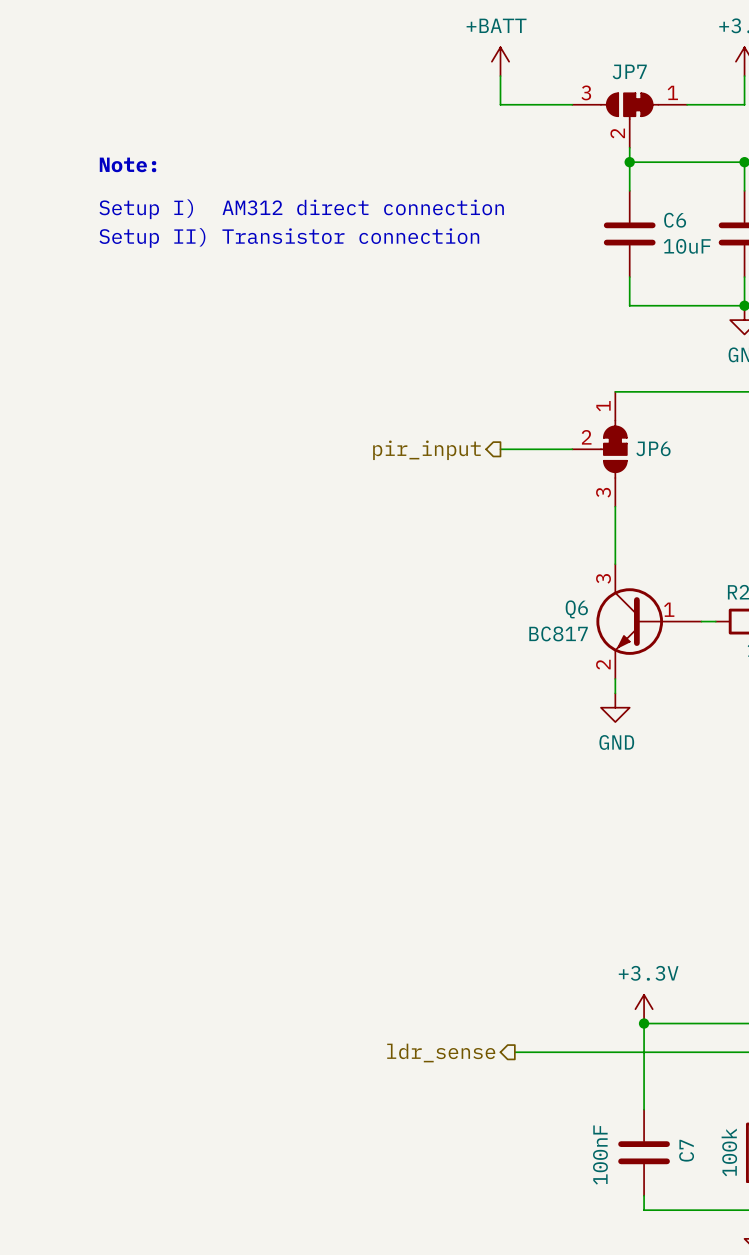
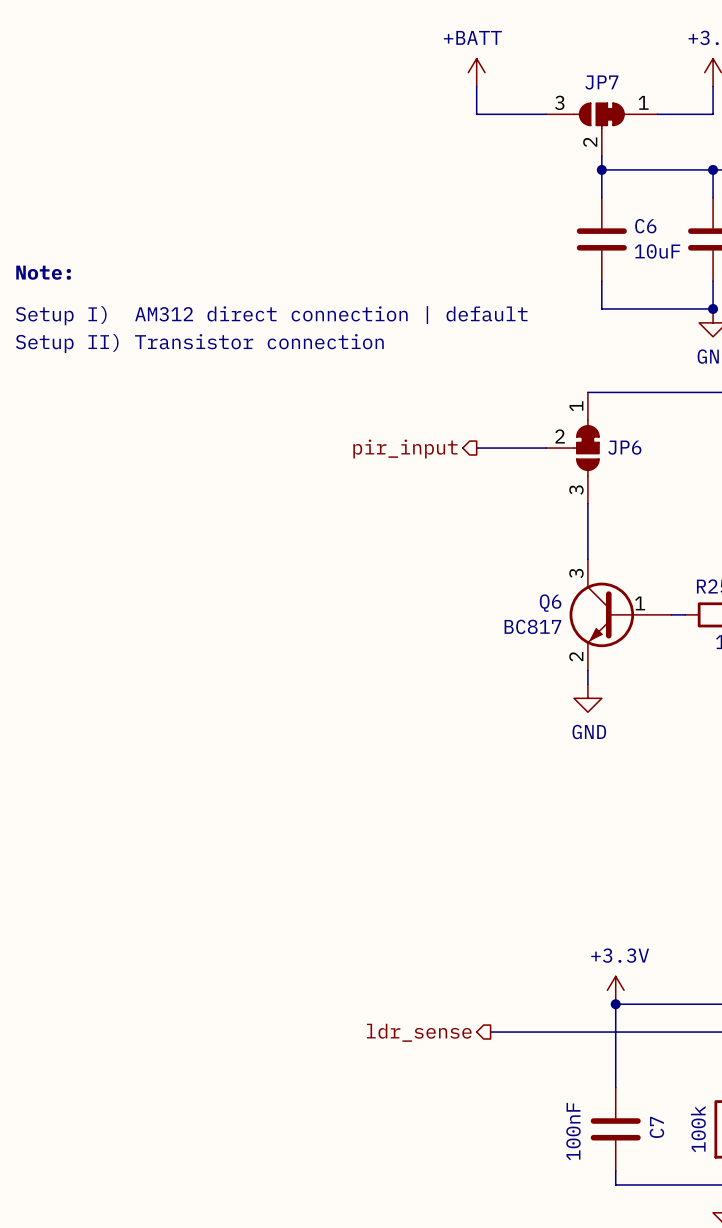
text position: Note: (128, 164) -> Note: (43, 272)
text: Setup I) AM312 direct connection (301, 209) -> none
text position: Setup II) Transistor connection (289, 237) -> Setup II) Transistor connection (199, 343)
text: none -> Setup I) AM312 direct connection | default (271, 315)

